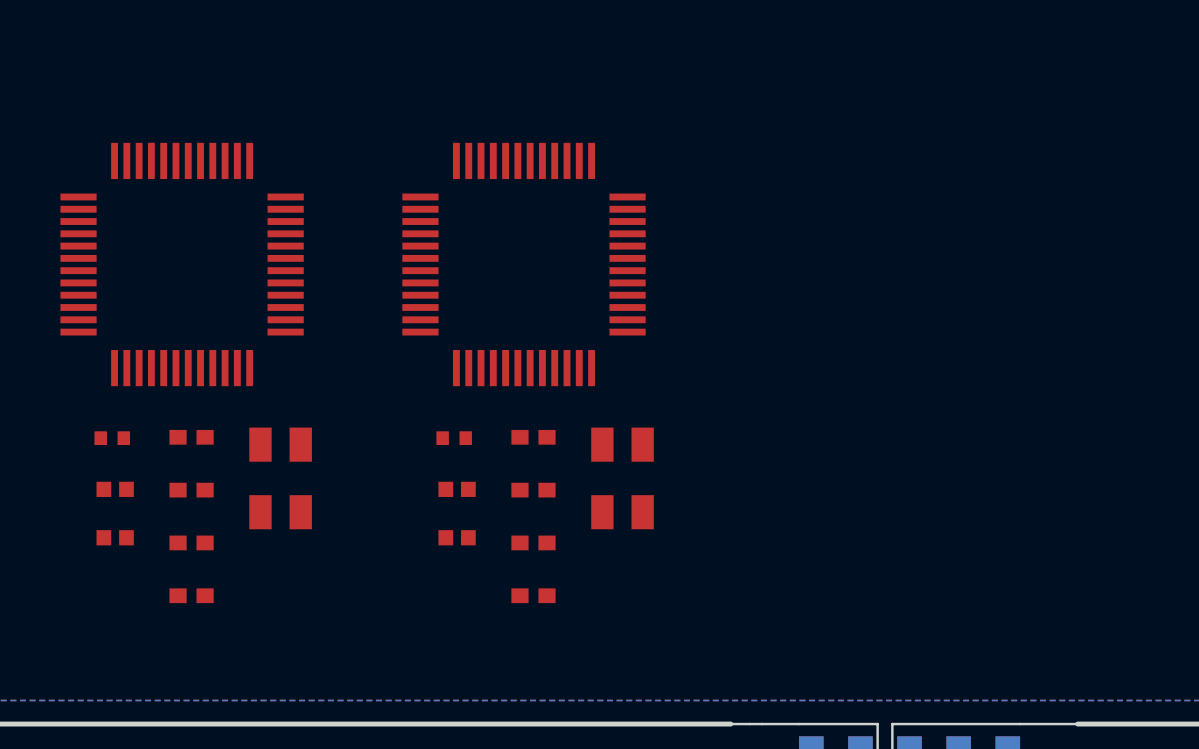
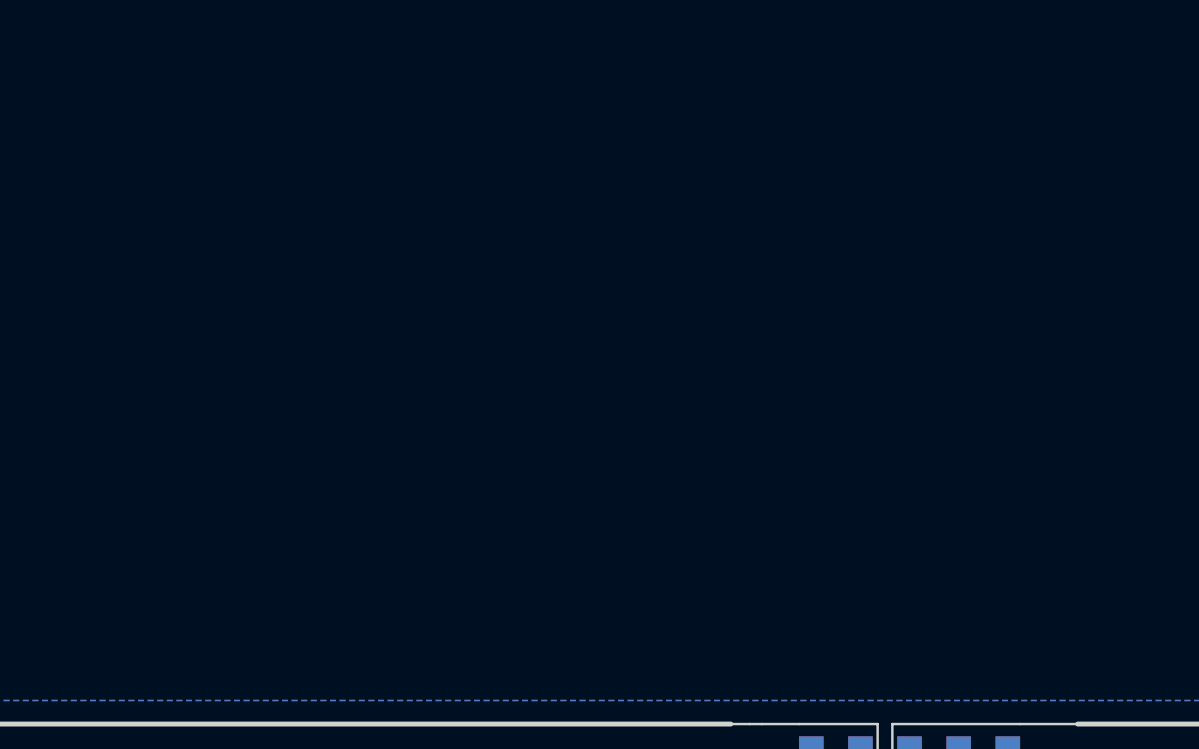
part: (182, 264) -> none
part: (524, 264) -> none
part: (191, 437) -> none
part: (533, 437) -> none
part: (112, 438) -> none
part: (454, 438) -> none
part: (280, 444) -> none
part: (622, 444) -> none
part: (115, 489) -> none
part: (457, 489) -> none
part: (191, 490) -> none
part: (533, 490) -> none
part: (280, 512) -> none
part: (622, 512) -> none
part: (115, 537) -> none
part: (457, 537) -> none
part: (191, 542) -> none
part: (533, 542) -> none
part: (191, 595) -> none
part: (533, 595) -> none

